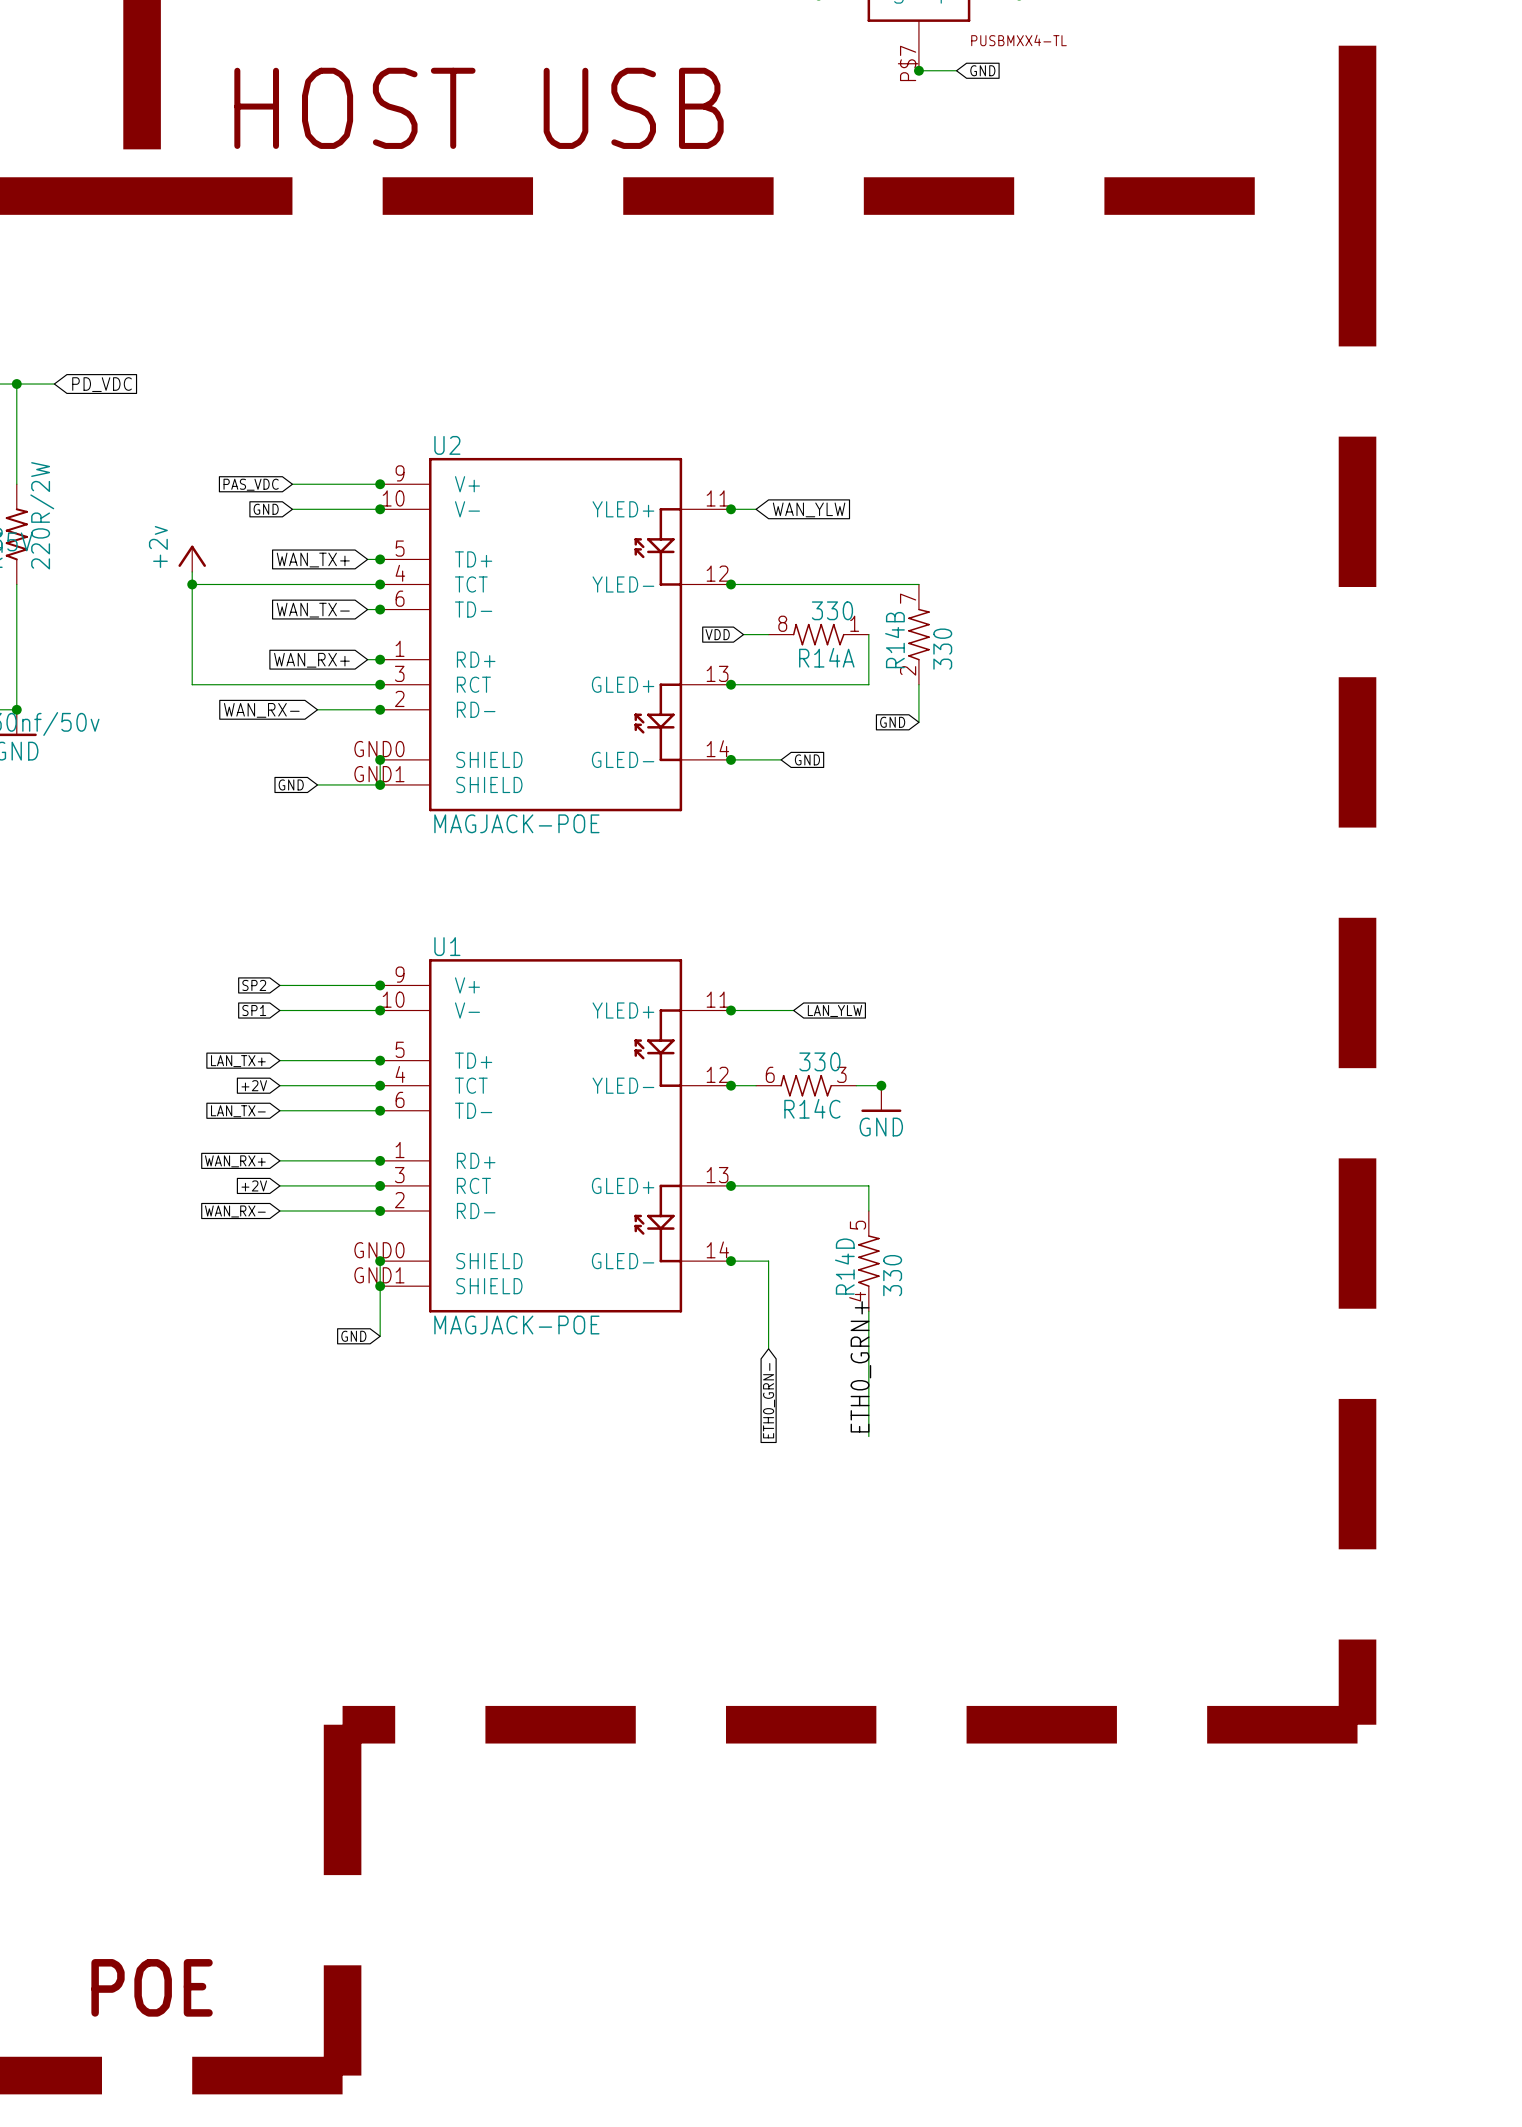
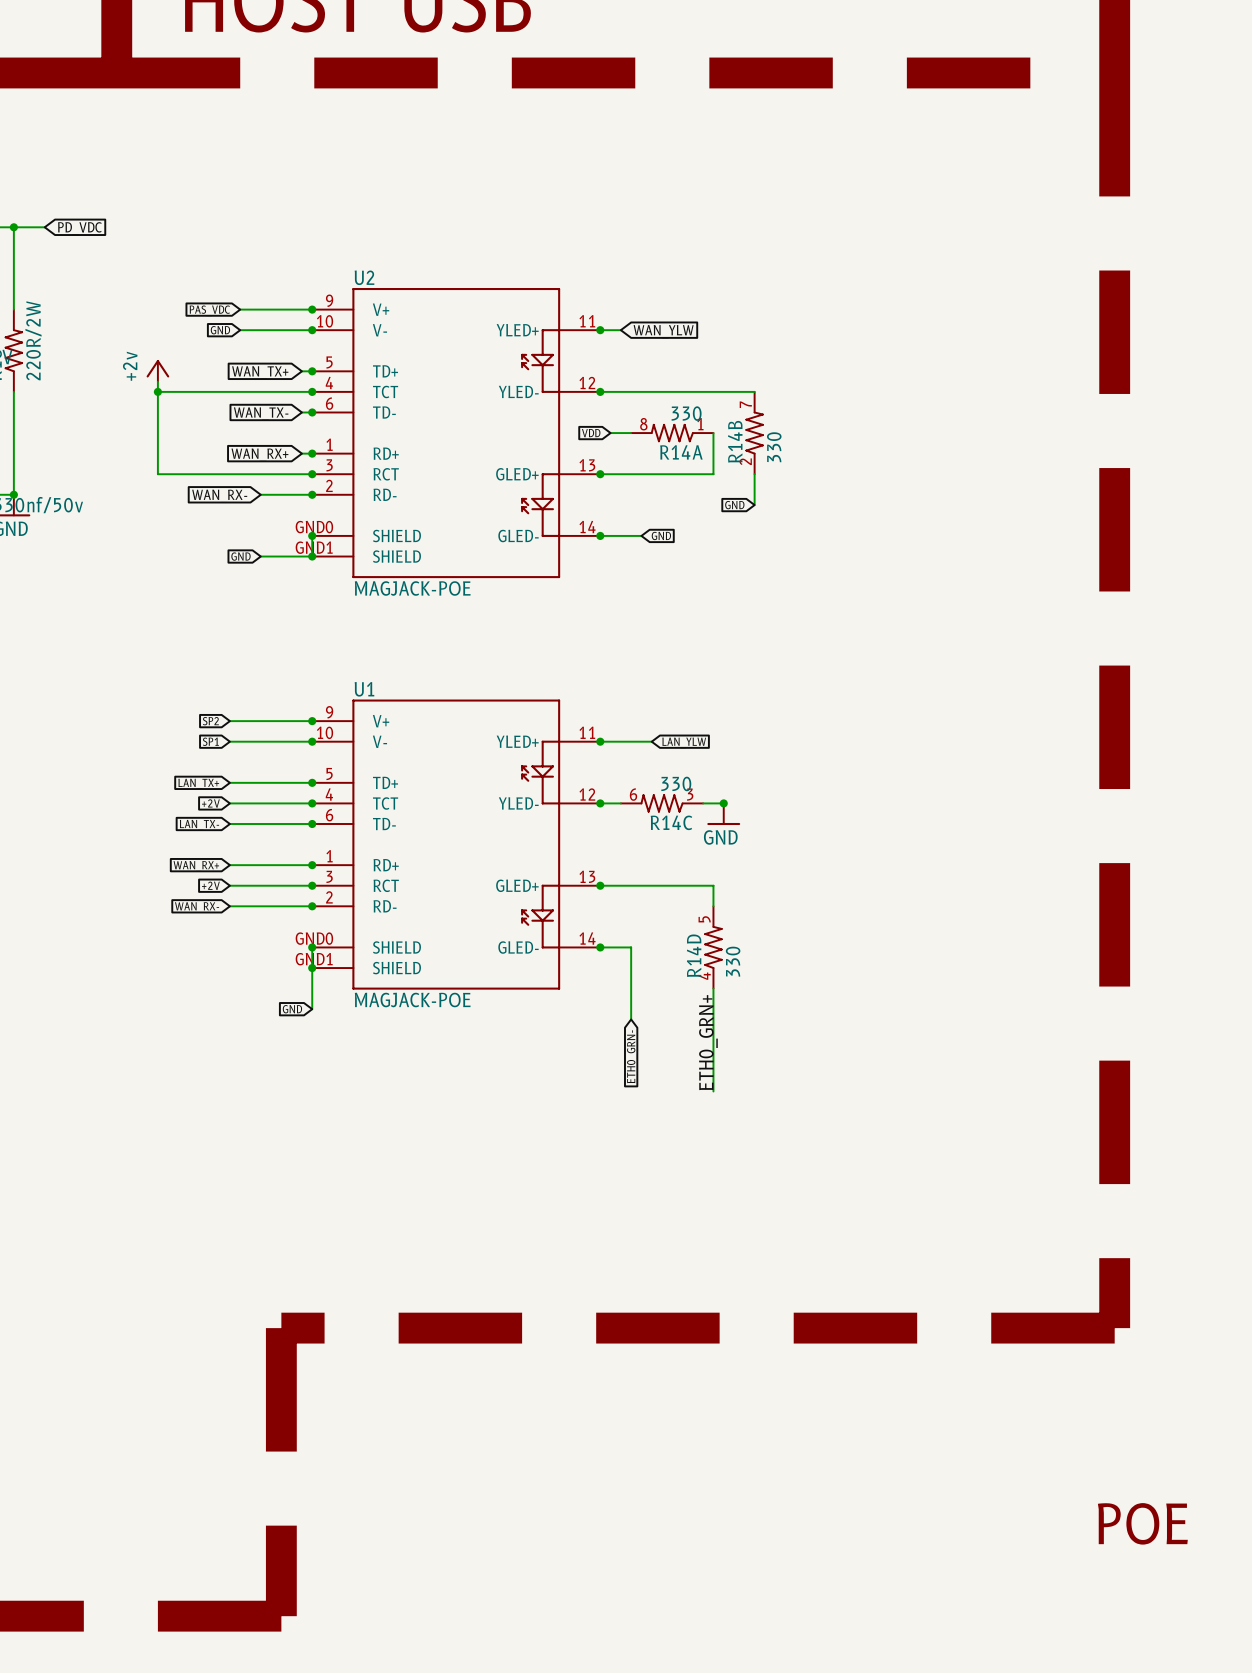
text: none -> POE (1142, 1523)
text: POE (152, 1987) -> none

